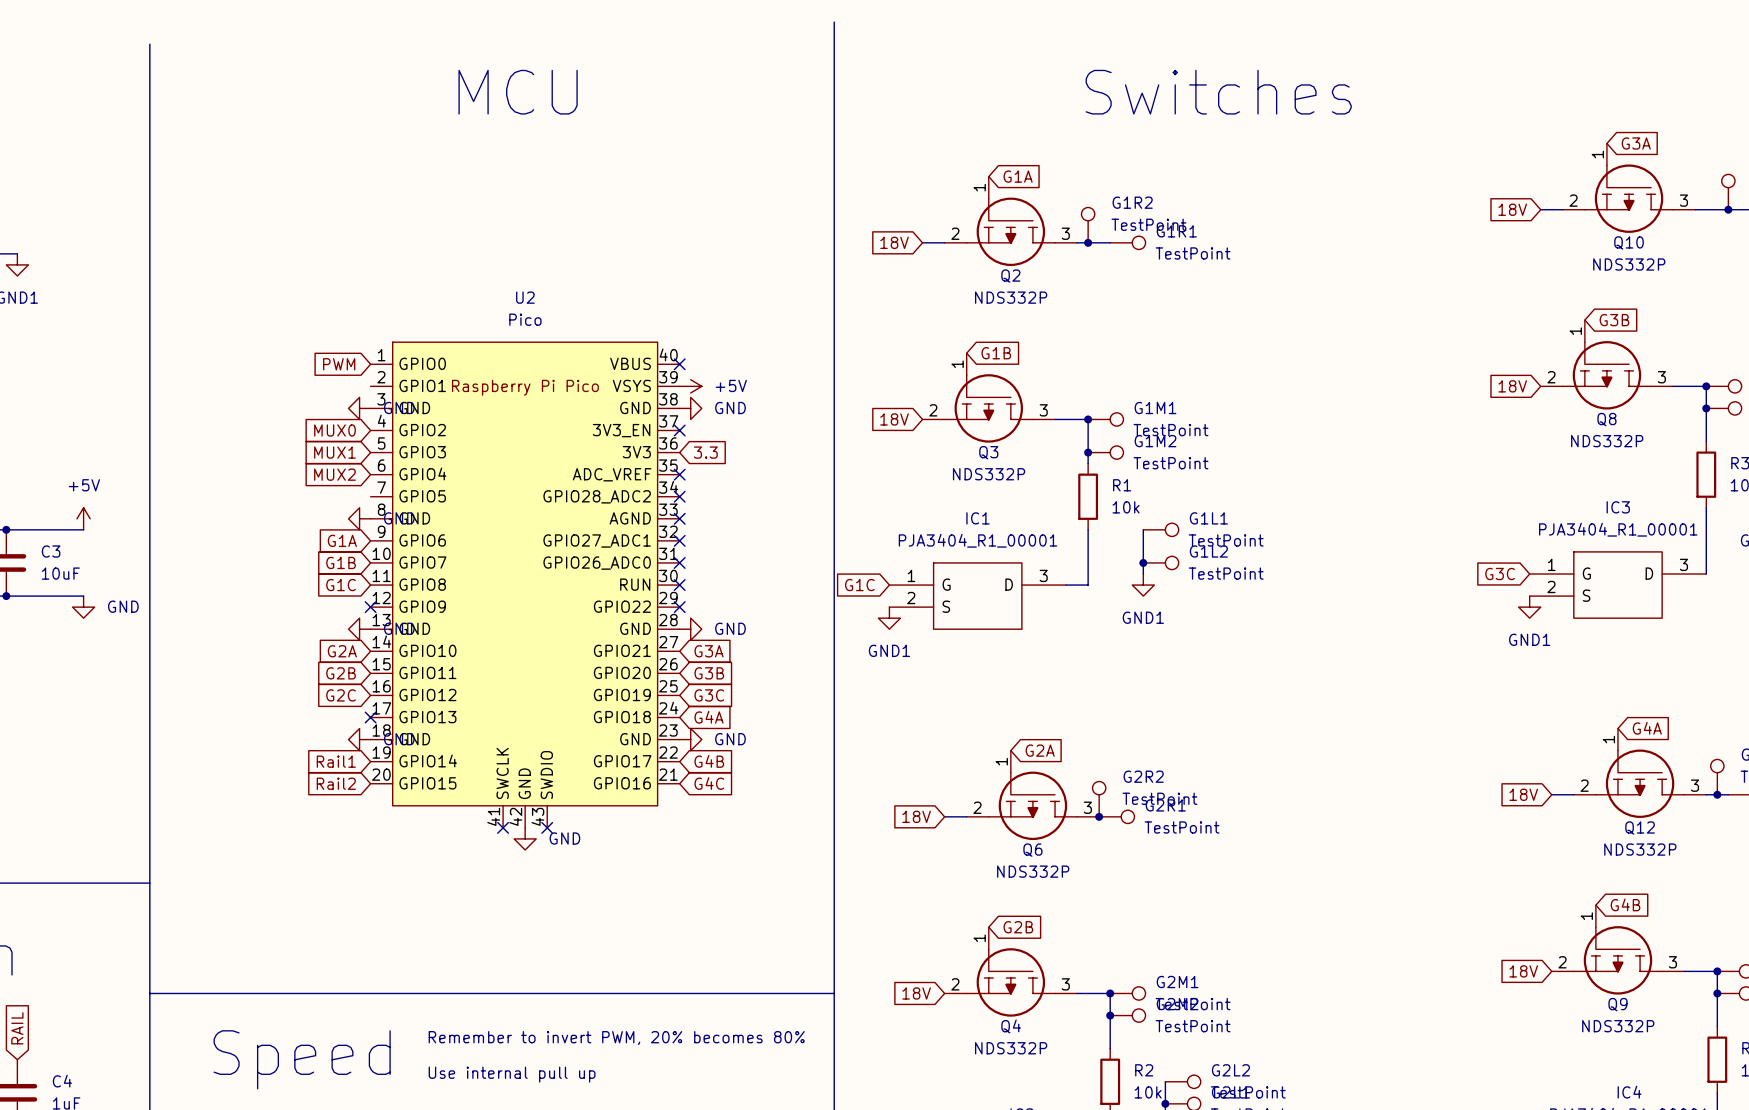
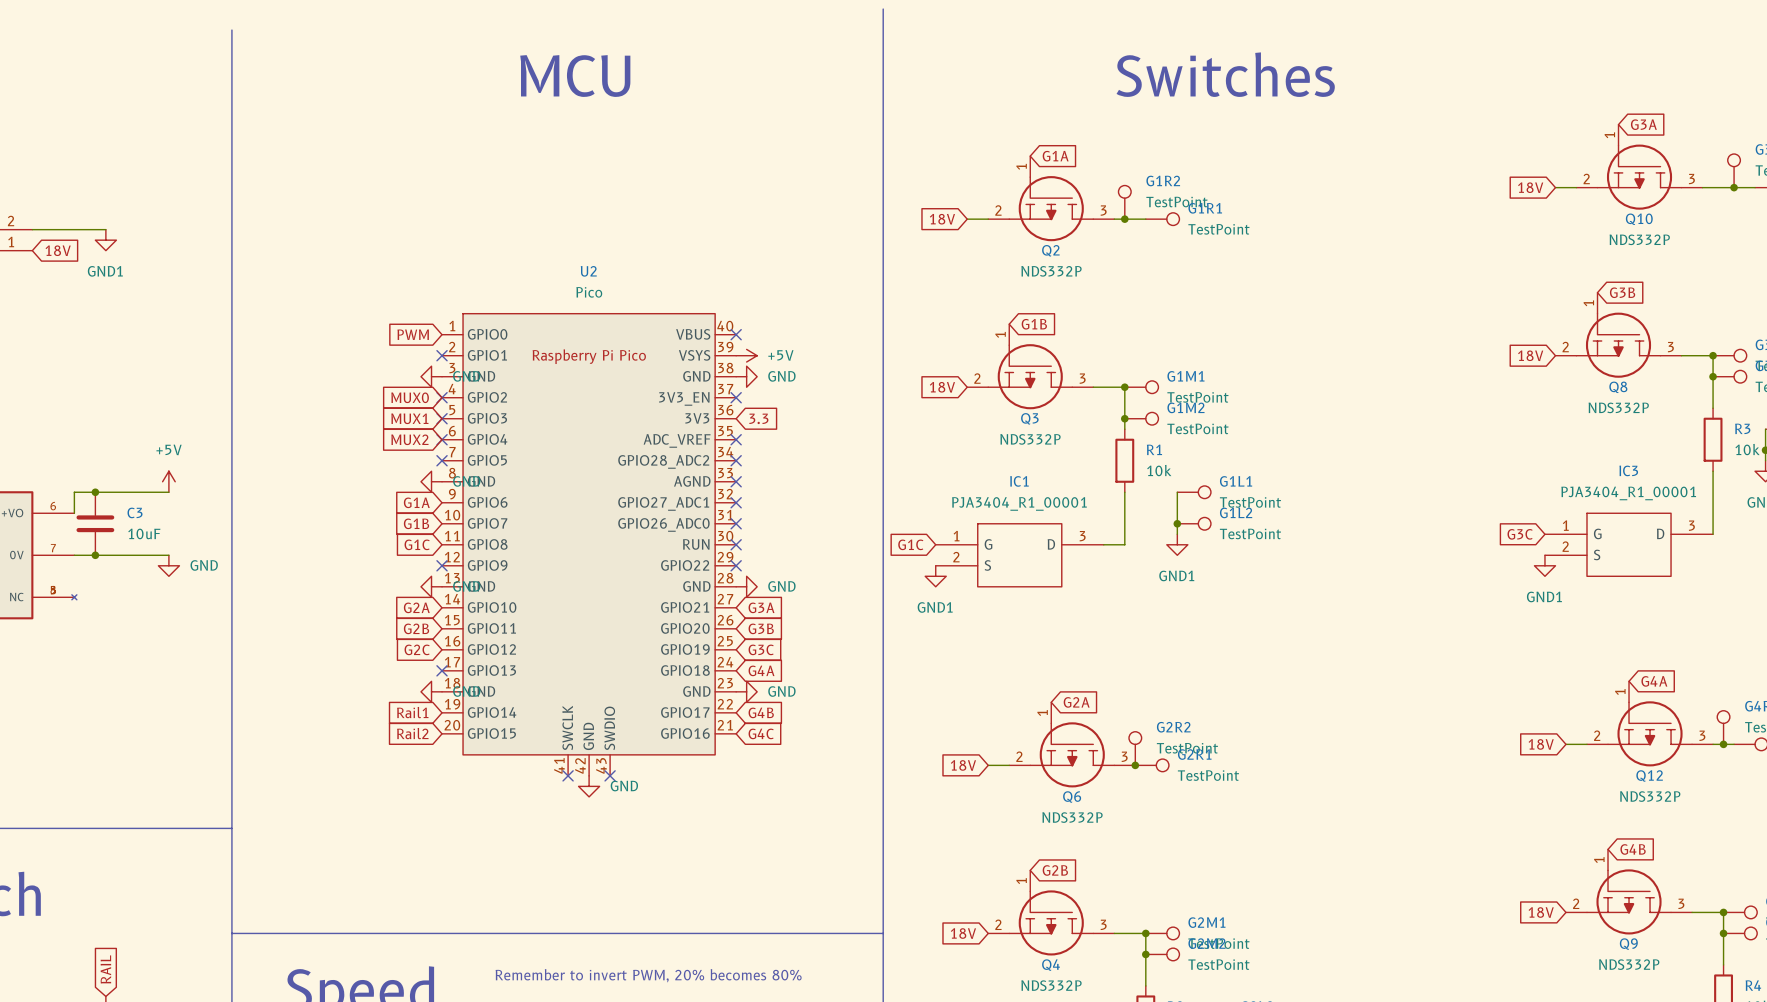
no-connect mark: none -> (442, 355)
no-connect mark: none -> (442, 397)
no-connect mark: none -> (442, 418)
no-connect mark: none -> (442, 439)
no-connect mark: none -> (442, 460)

